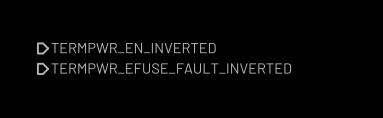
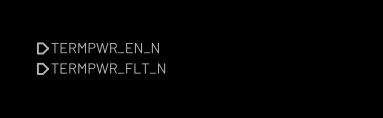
hierarchical label: TERMPWR_EN_INVERTED (133, 48) -> TERMPWR_EN_N (105, 48)
hierarchical label: TERMPWR_EFUSE_FAULT_INVERTED (171, 68) -> TERMPWR_FLT_N (108, 68)

